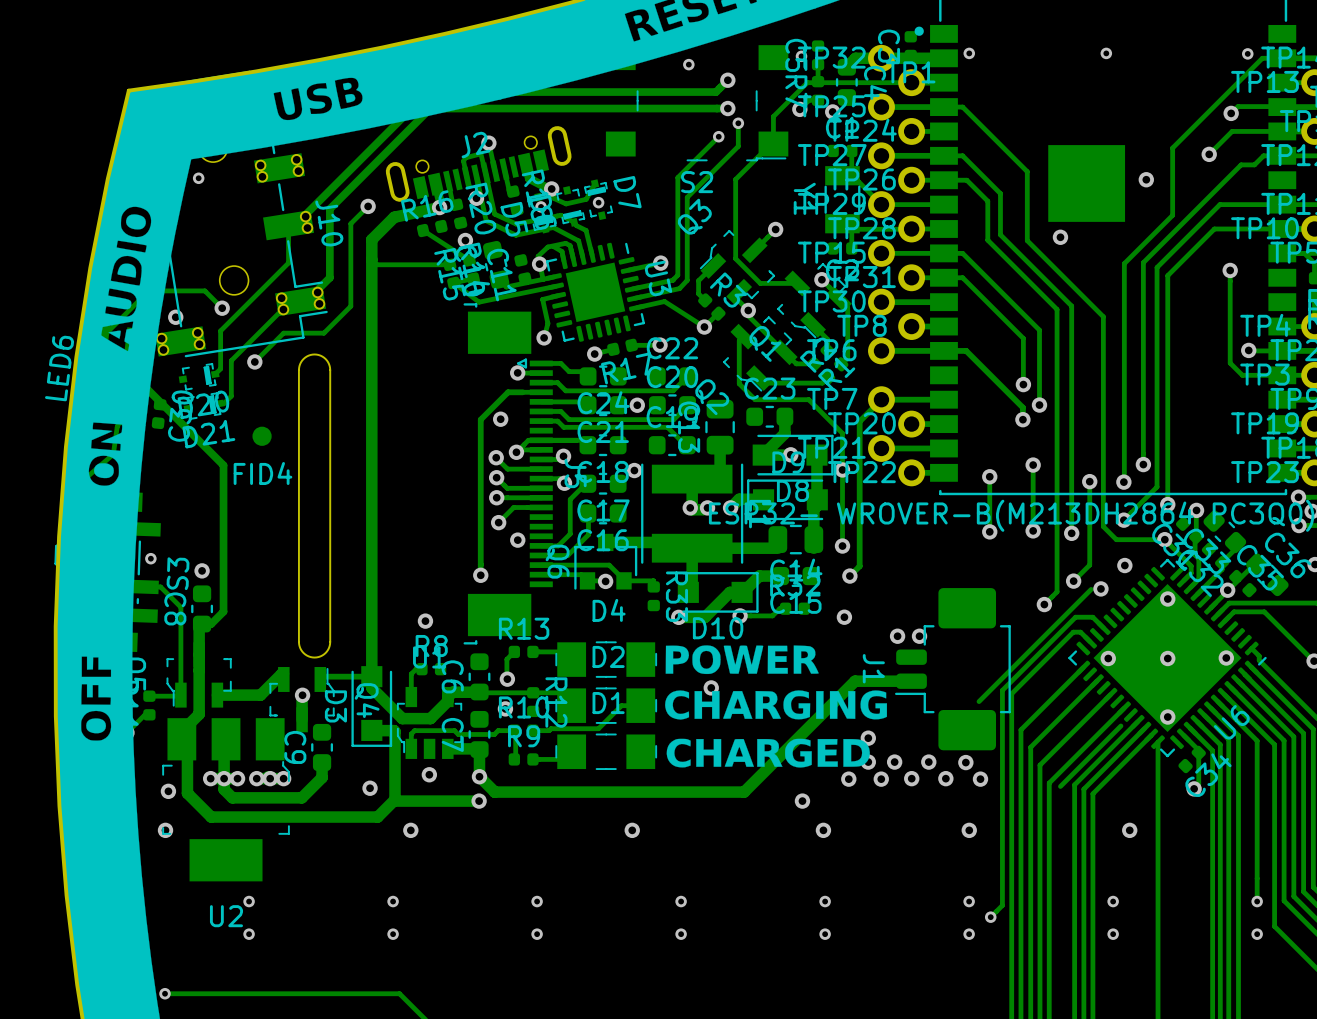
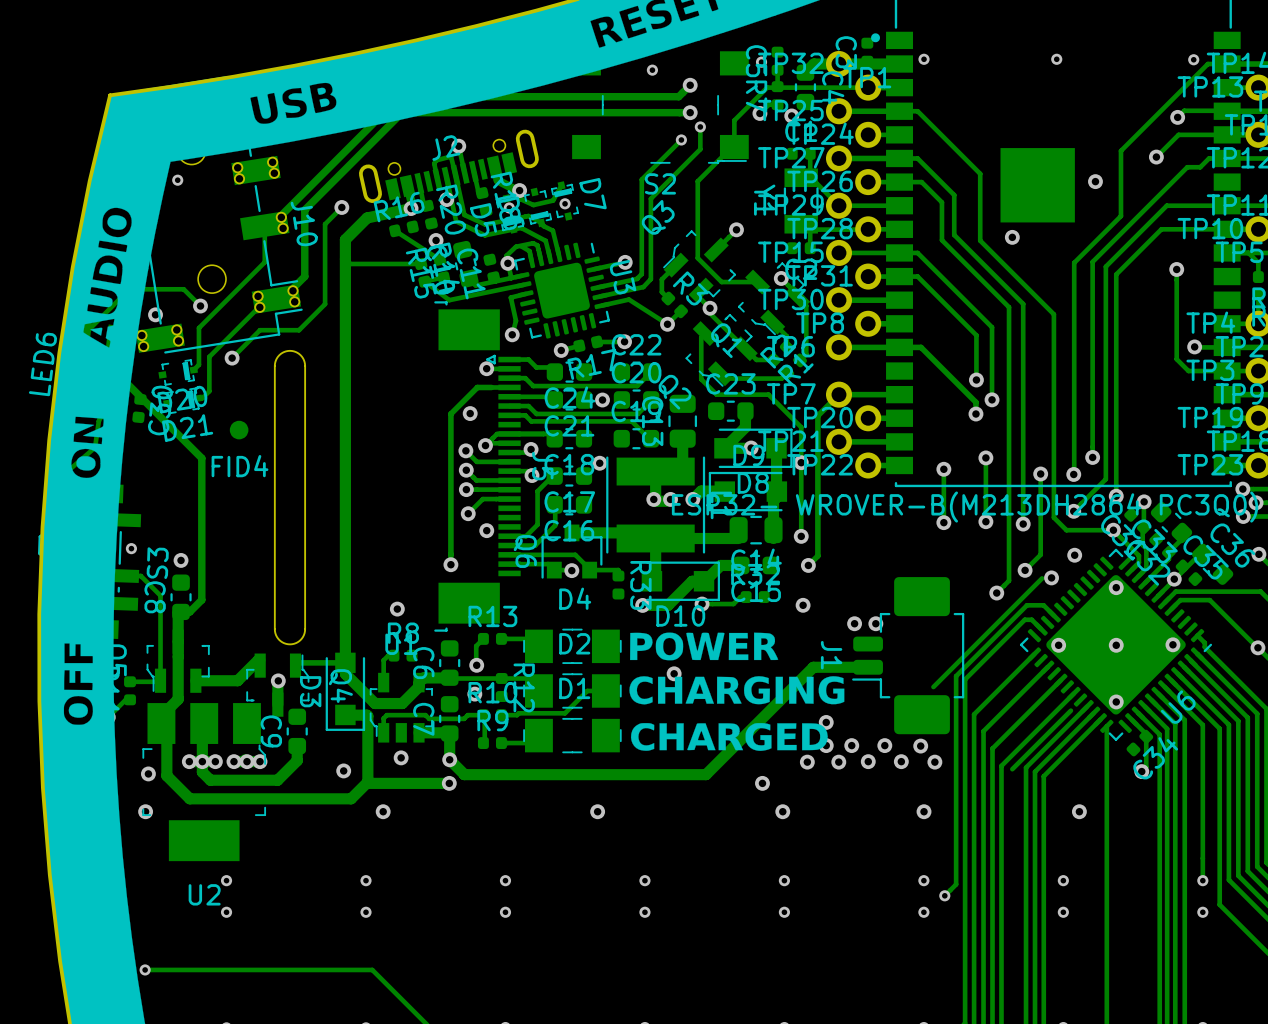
U3 footprint: [545, 242, 645, 342] -> [514, 242, 610, 339]
U6 footprint: [1068, 558, 1267, 758] -> [1019, 548, 1213, 741]

